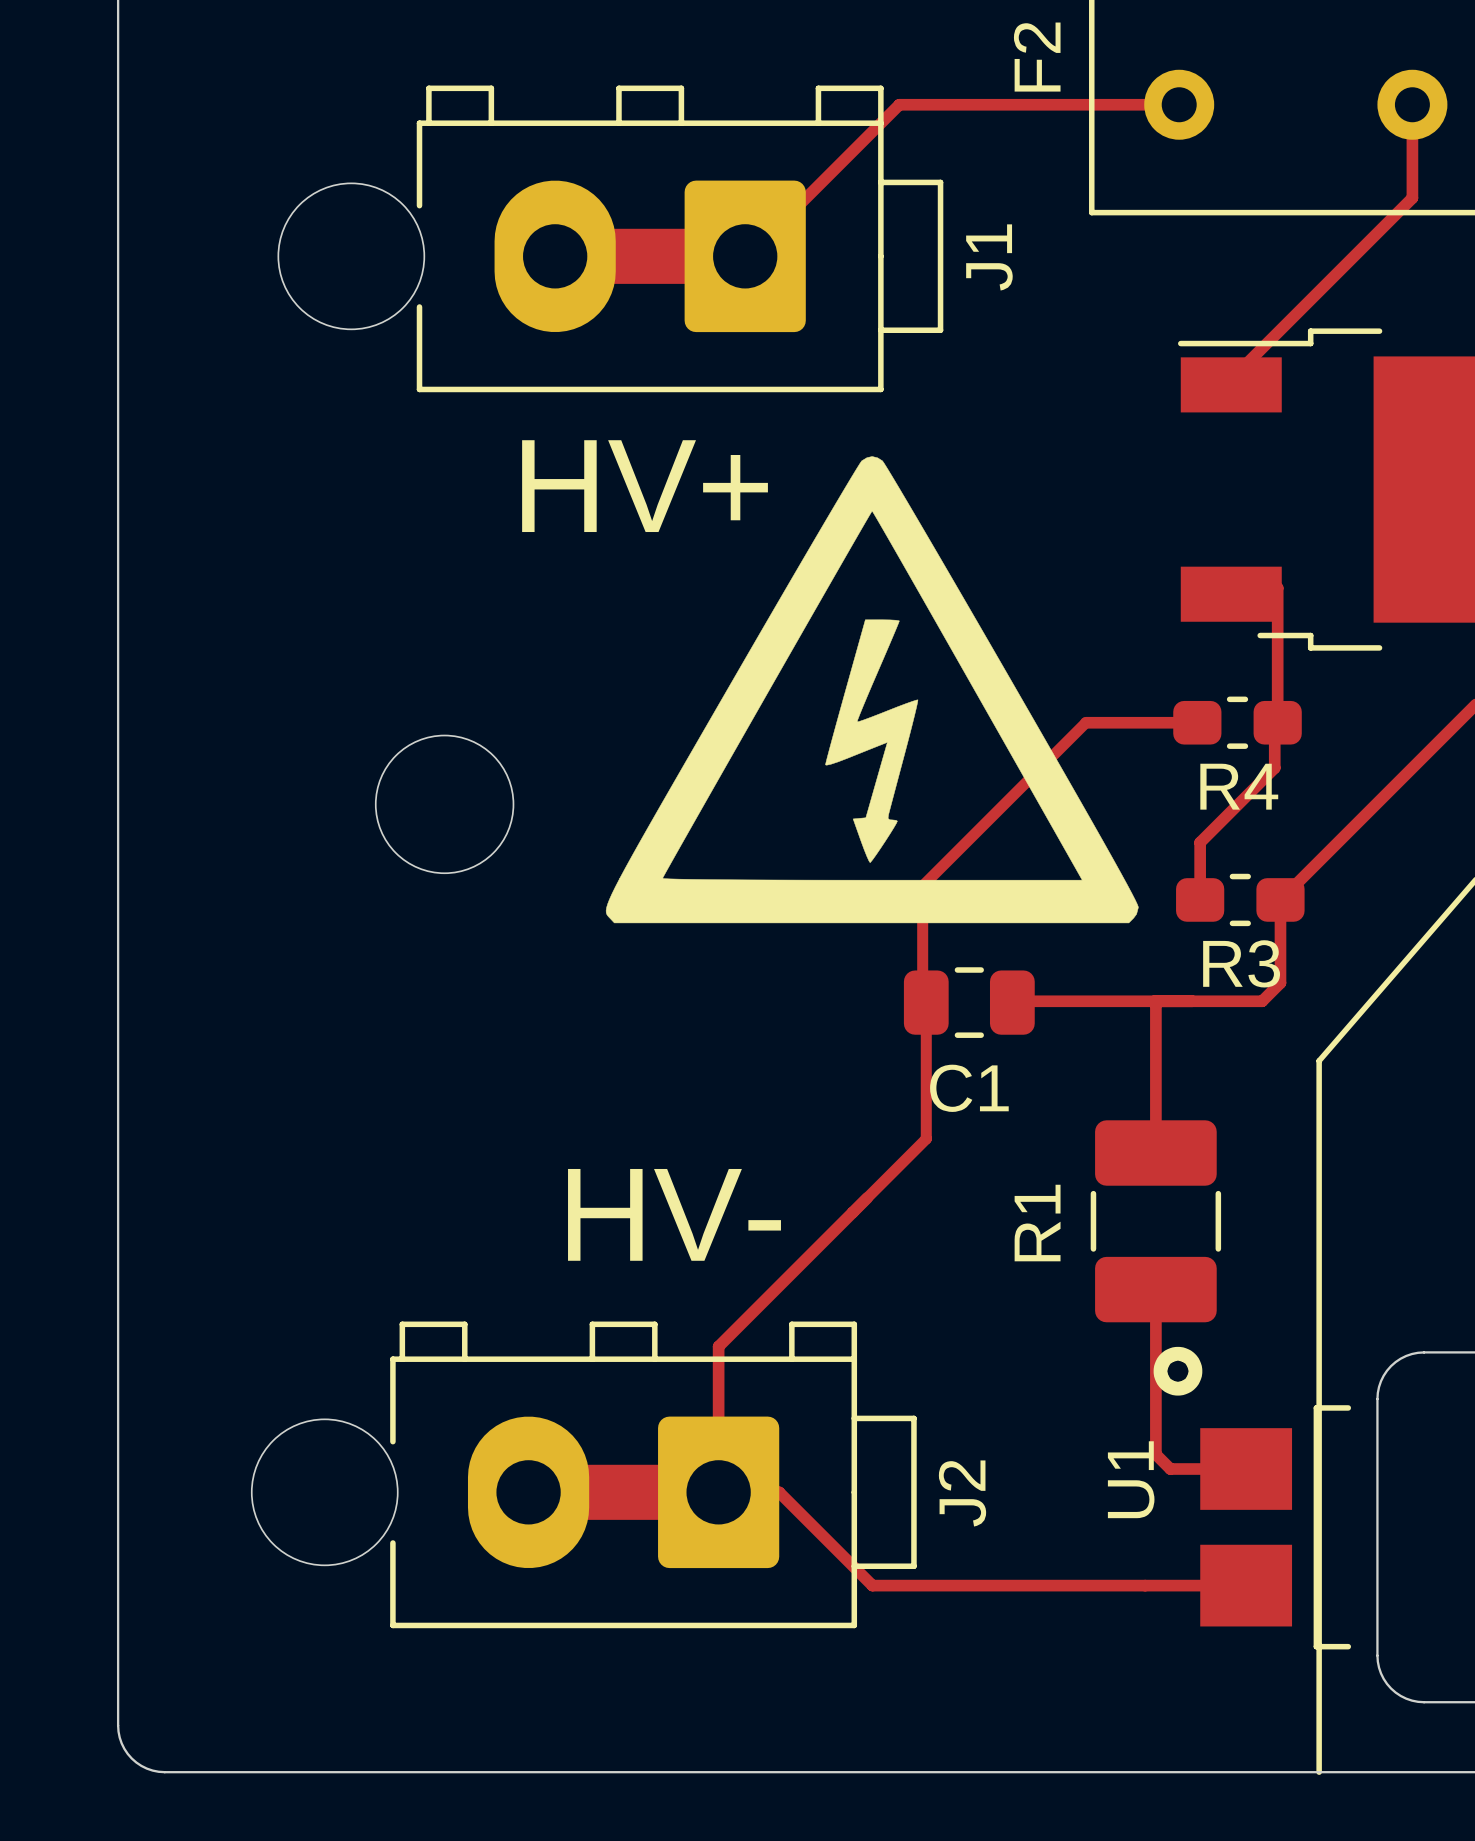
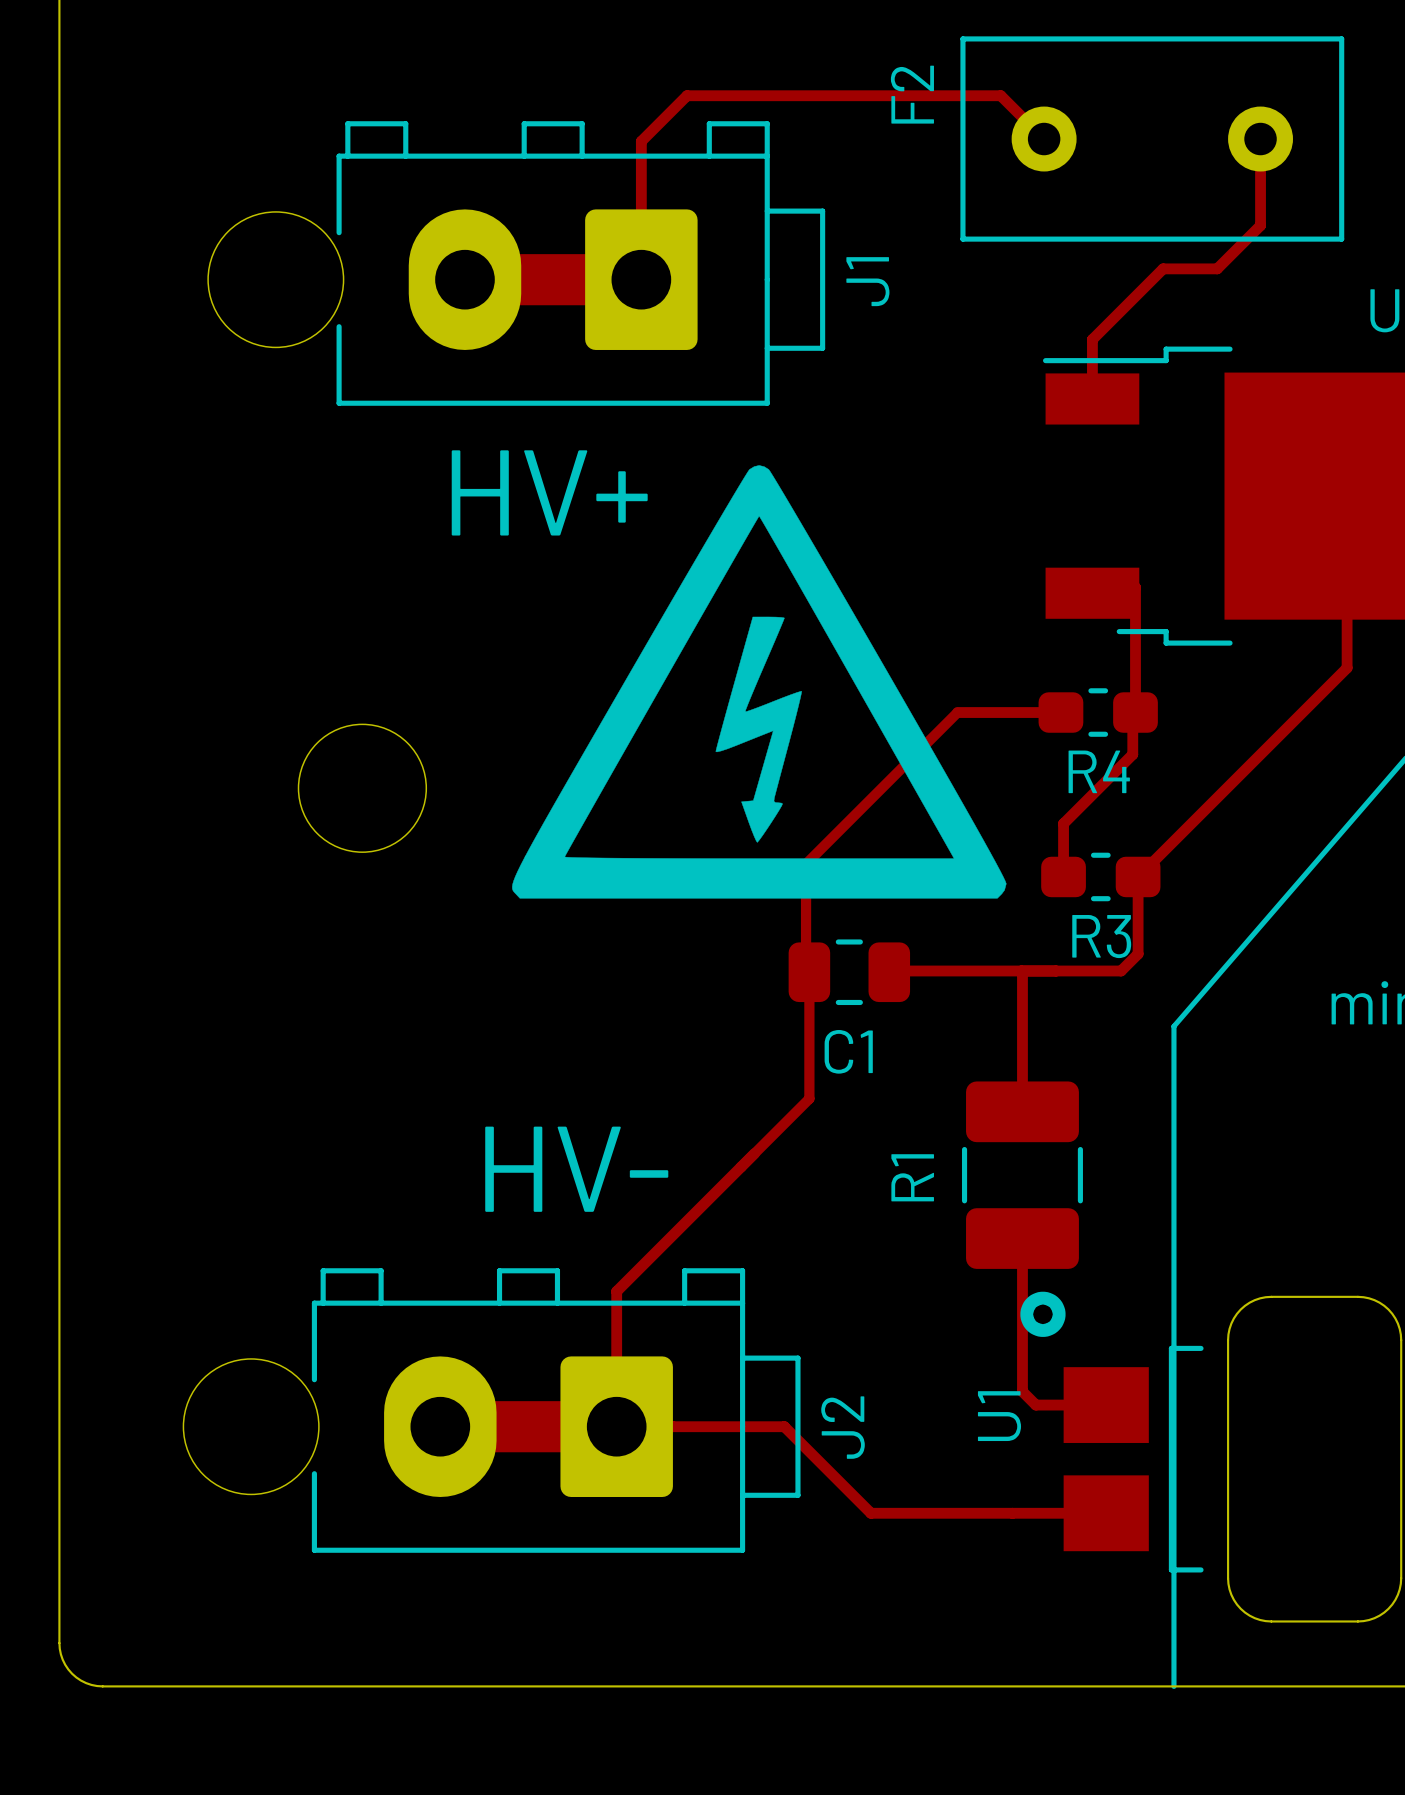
track: (1179, 104) (899, 104) (747, 256) -> (1044, 139) (1000, 95) (687, 95) (641, 141) (641, 279)
track: (1365, 244) (1237, 372) -> (1217, 268) (1163, 268) (1092, 339) (1092, 398)
track: (779, 1492) (872, 1585) (992, 1585) -> (672, 1426) (784, 1426) (870, 1513)

